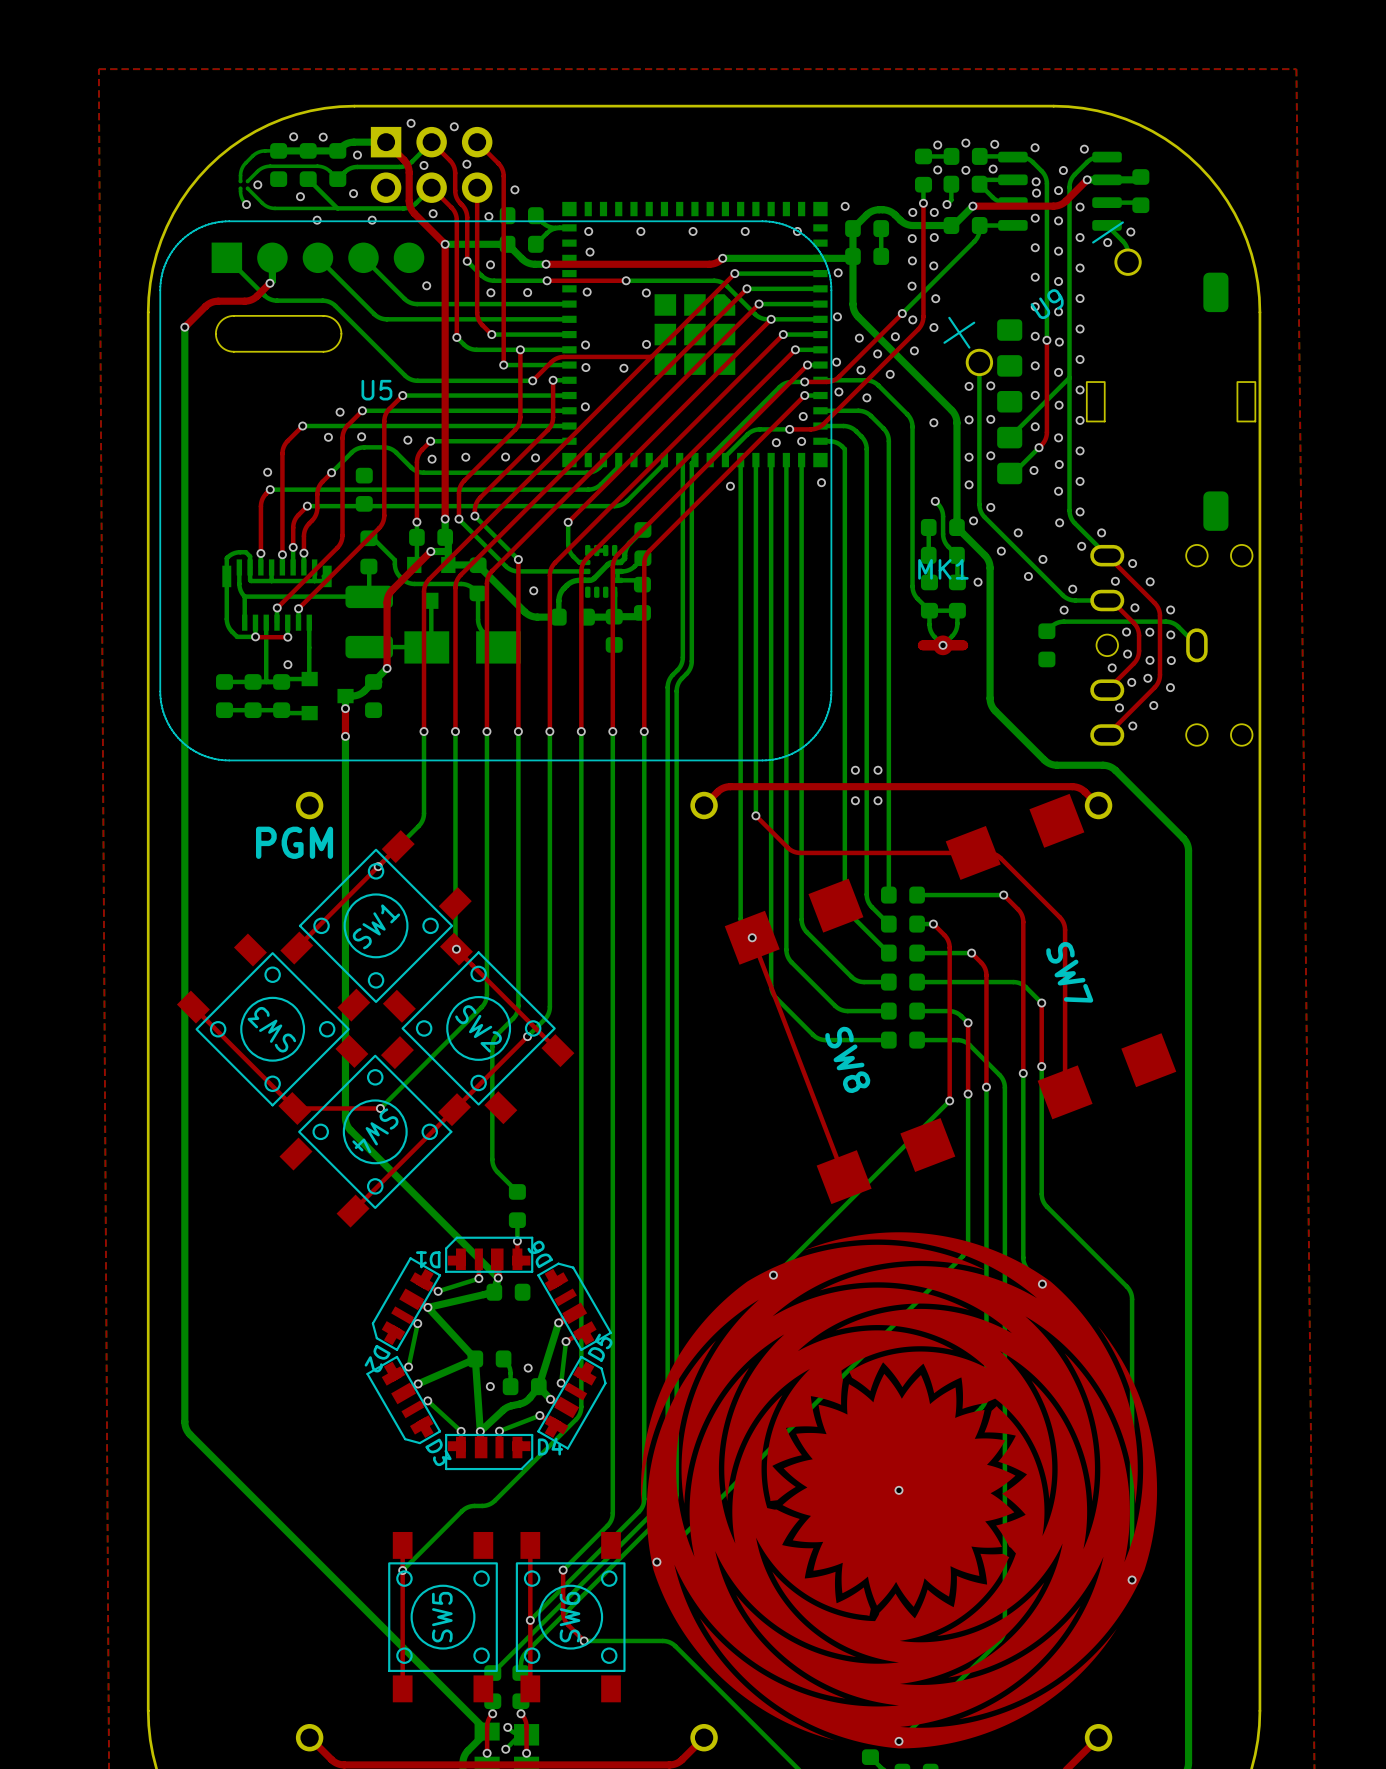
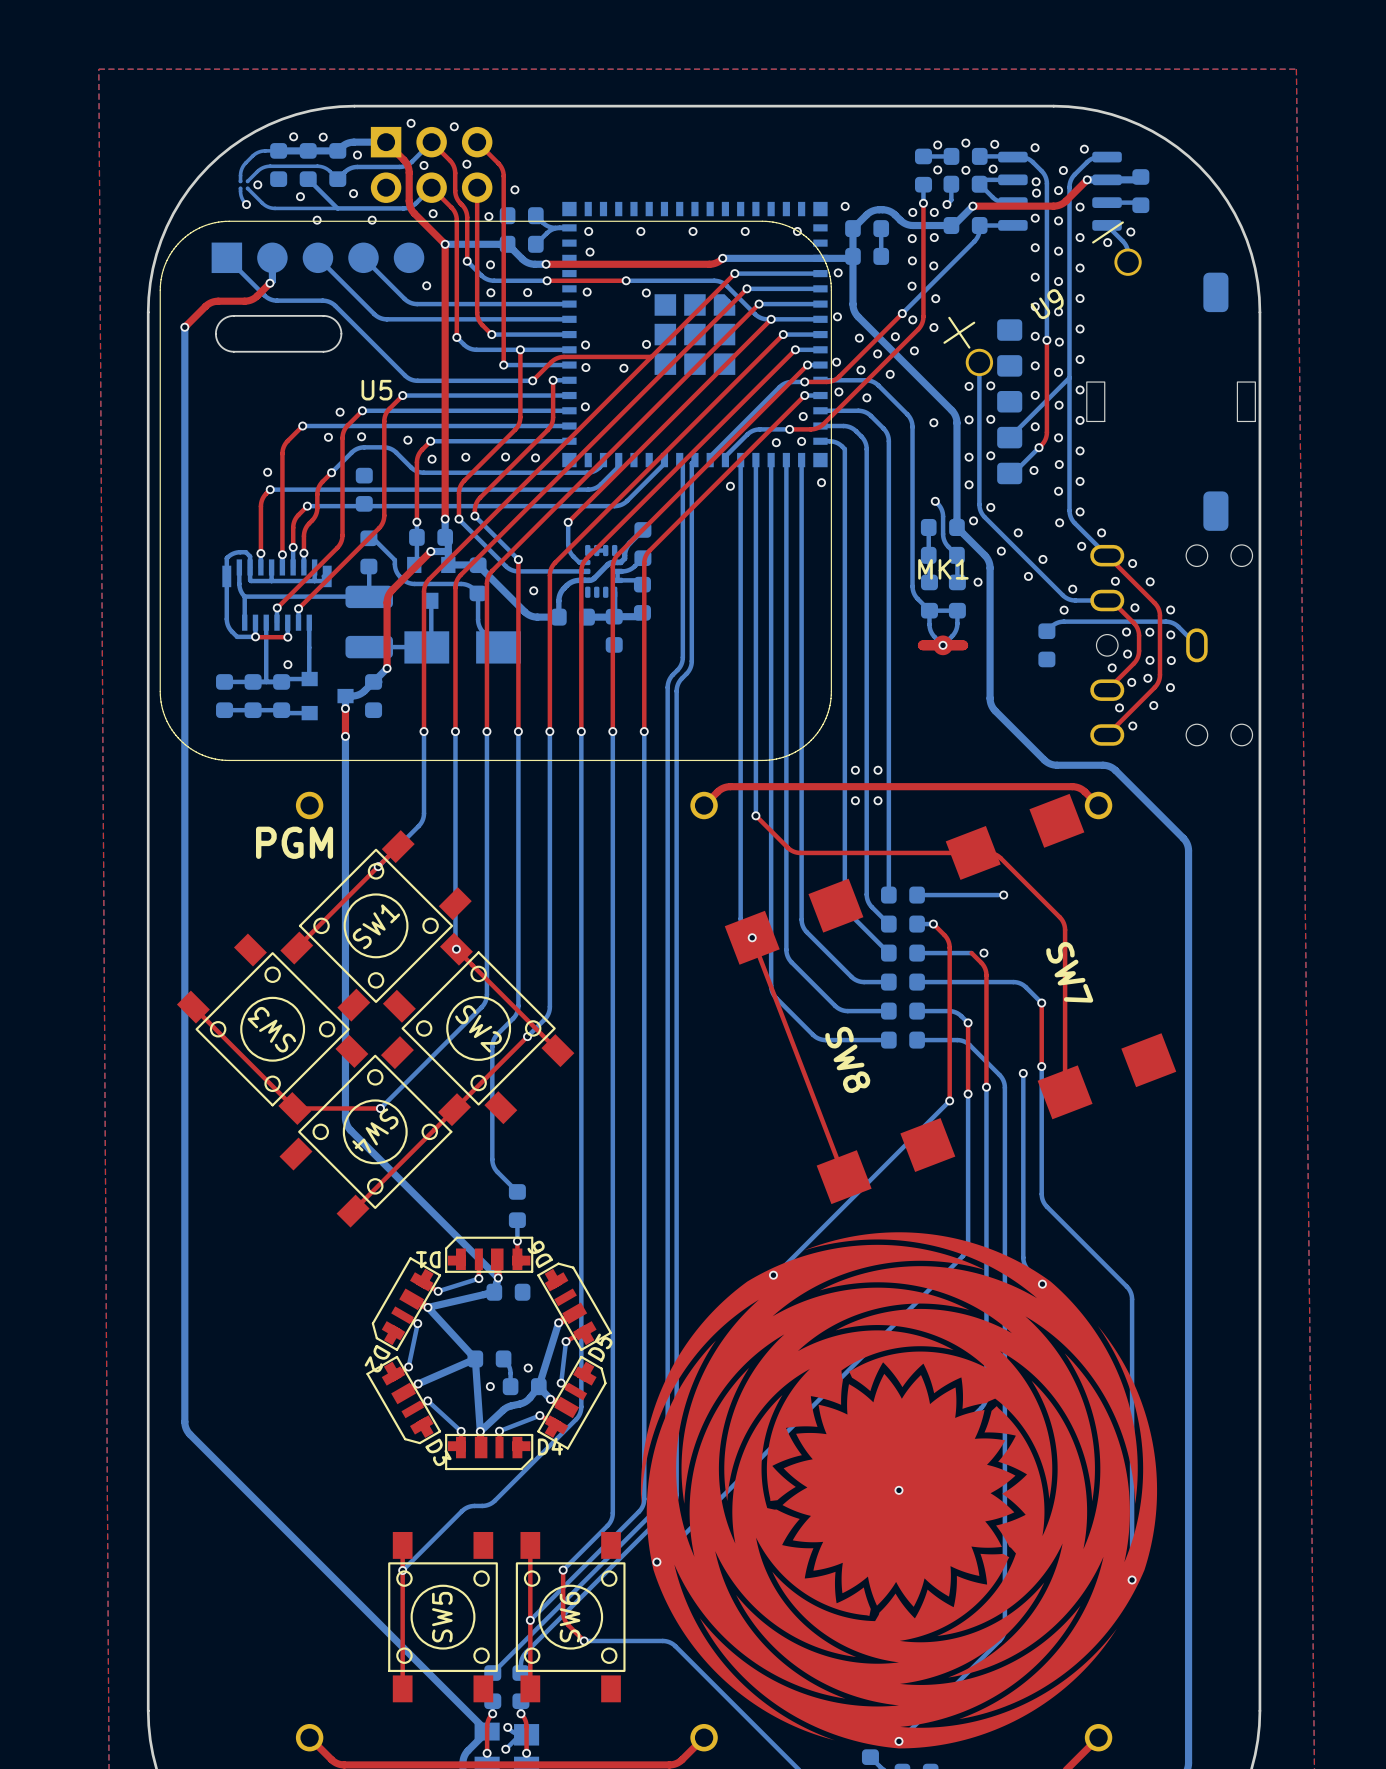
top track: (1003, 895) (1019, 910) (1023, 920) (1023, 1073) -> none
via position: (971, 953) -> (983, 953)

